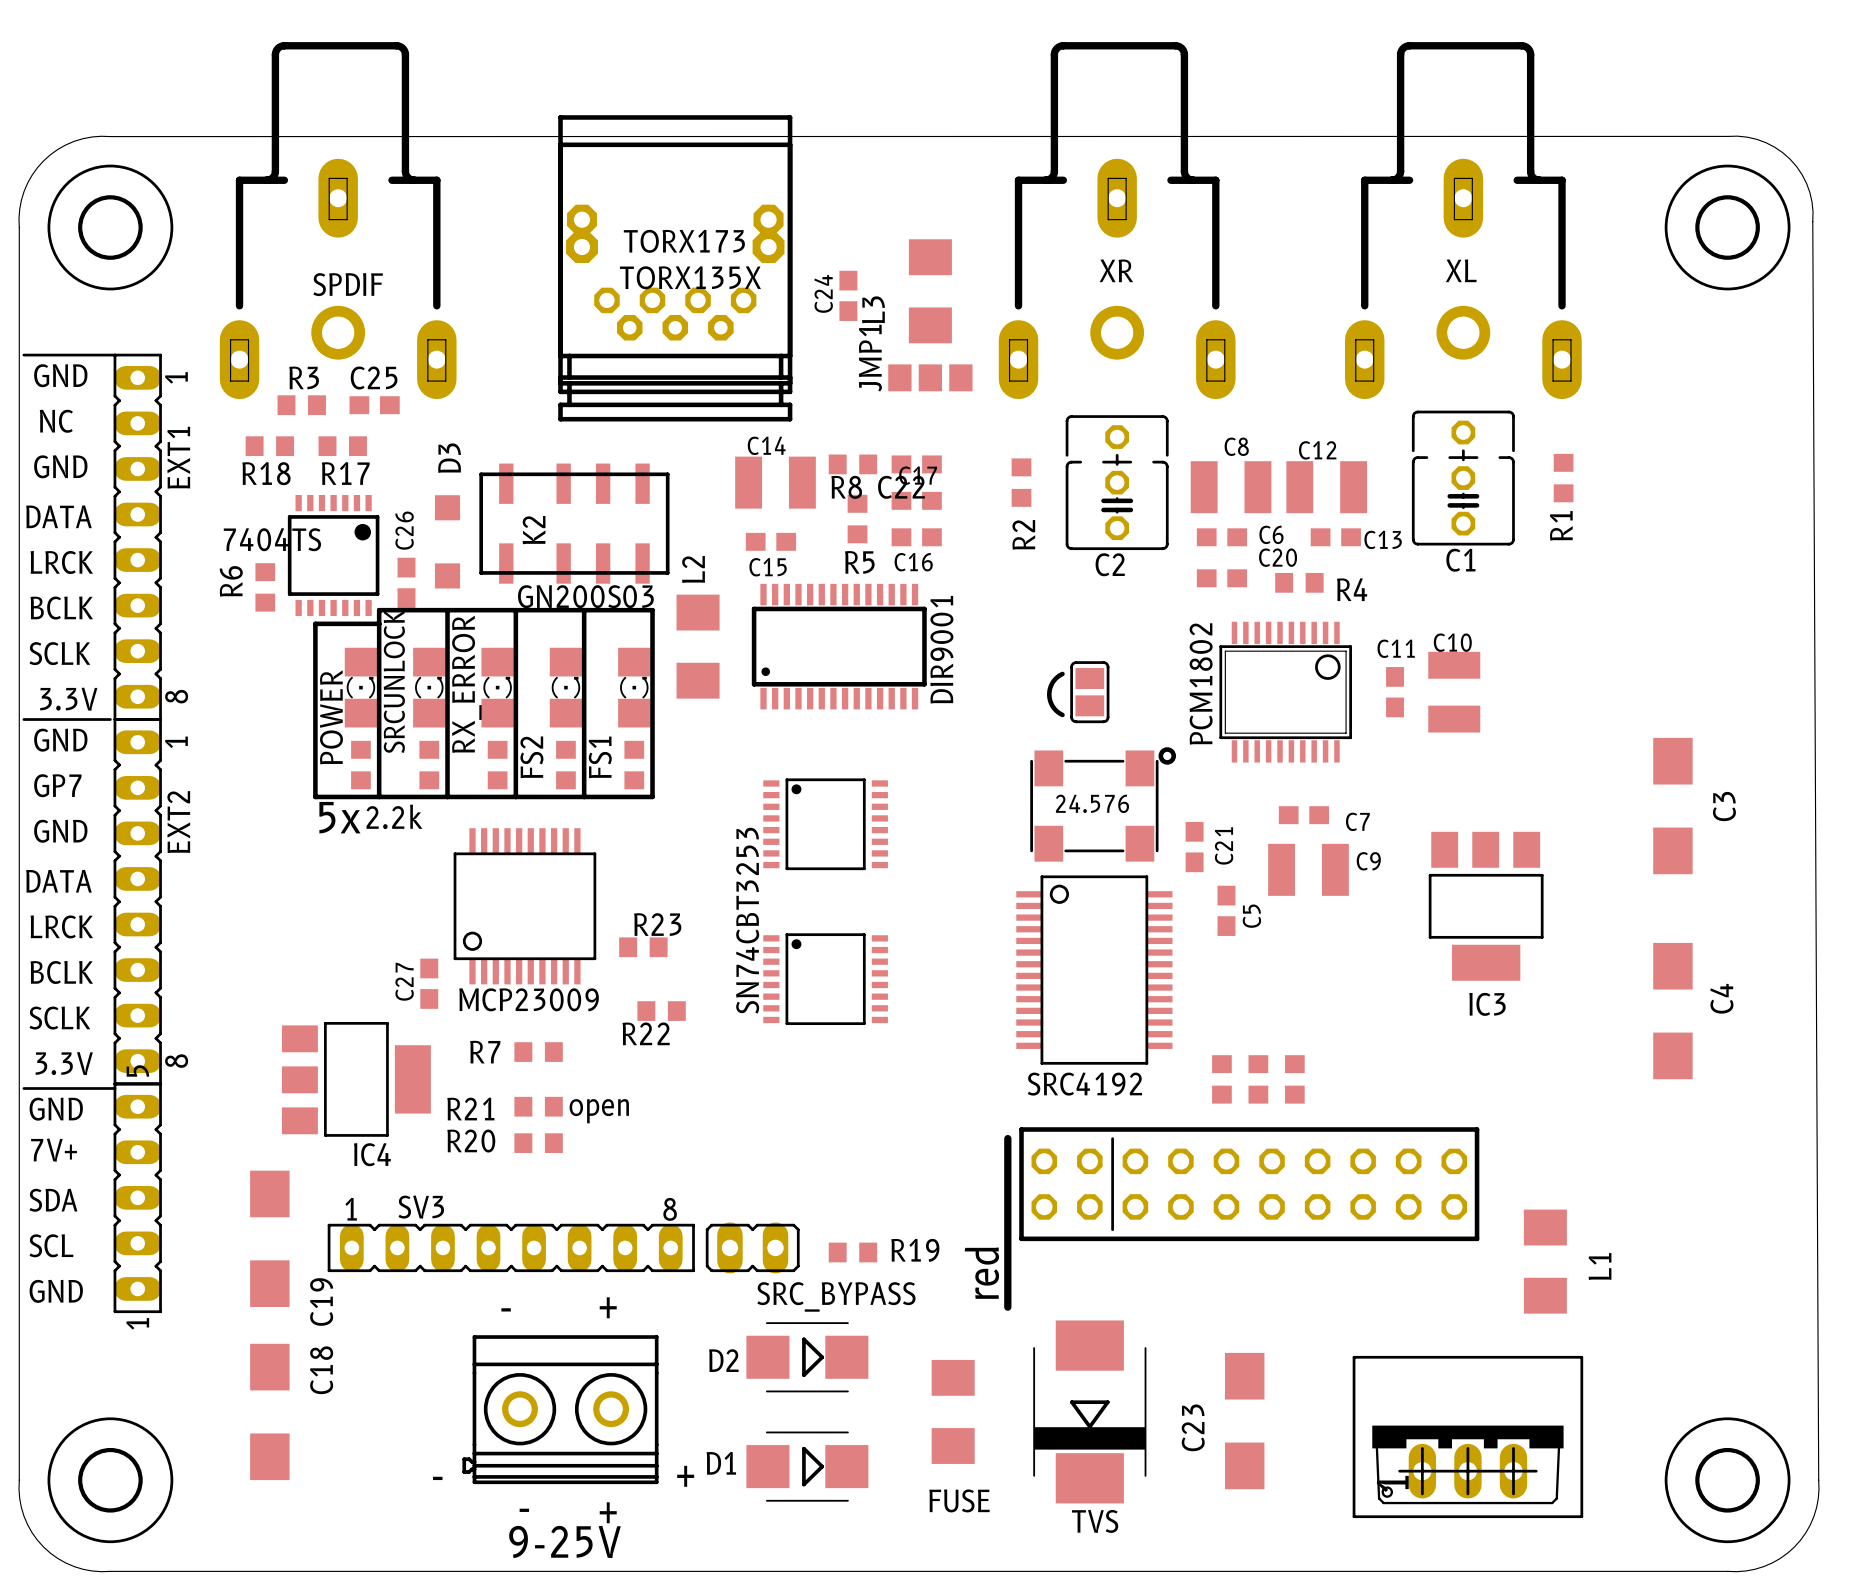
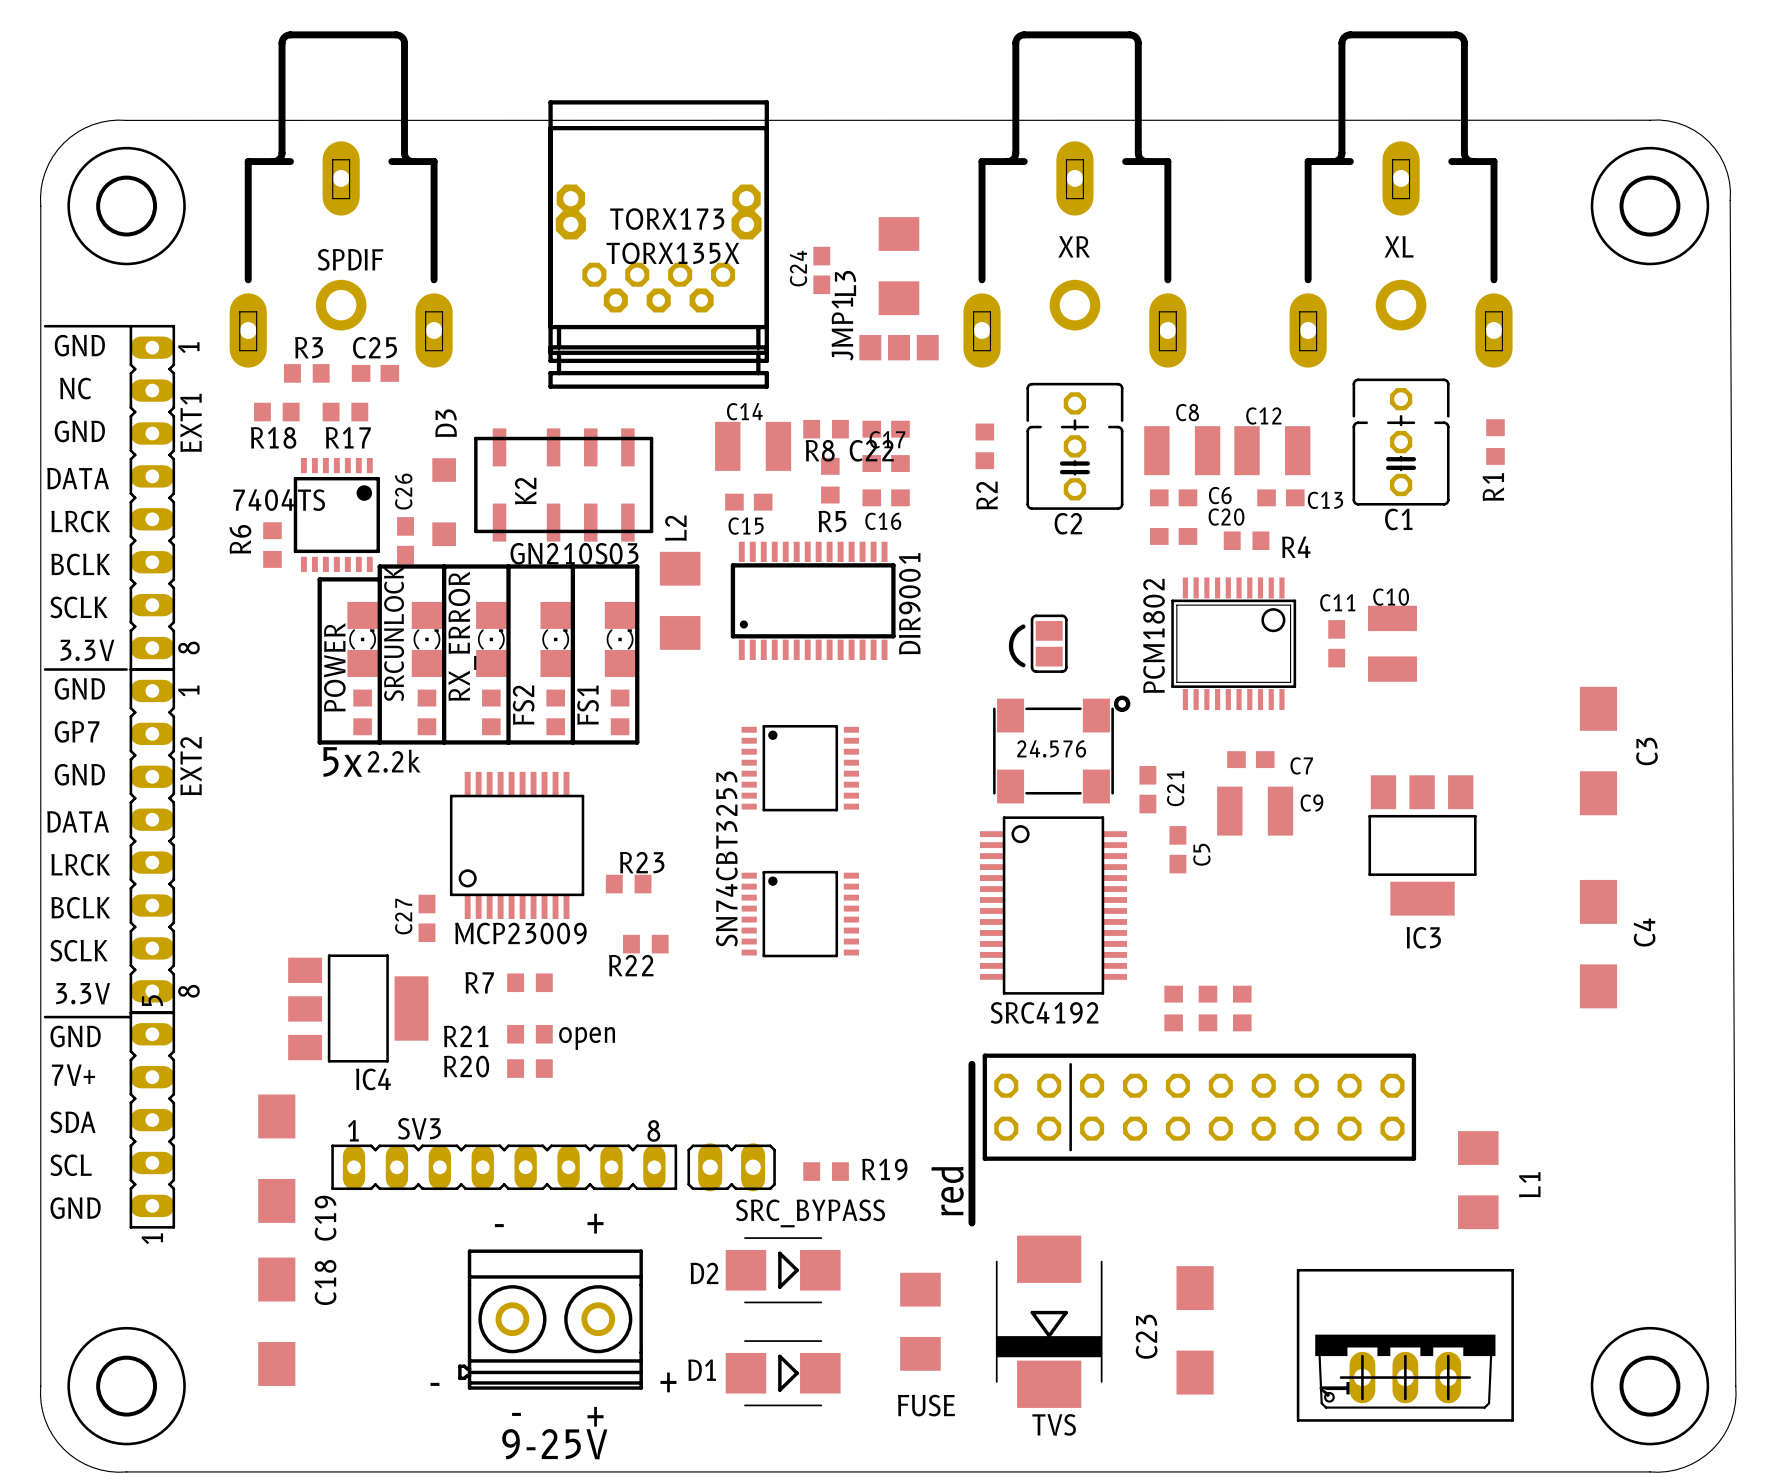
K2 value: GN200S03 (585, 596) -> GN210S03 (574, 553)

